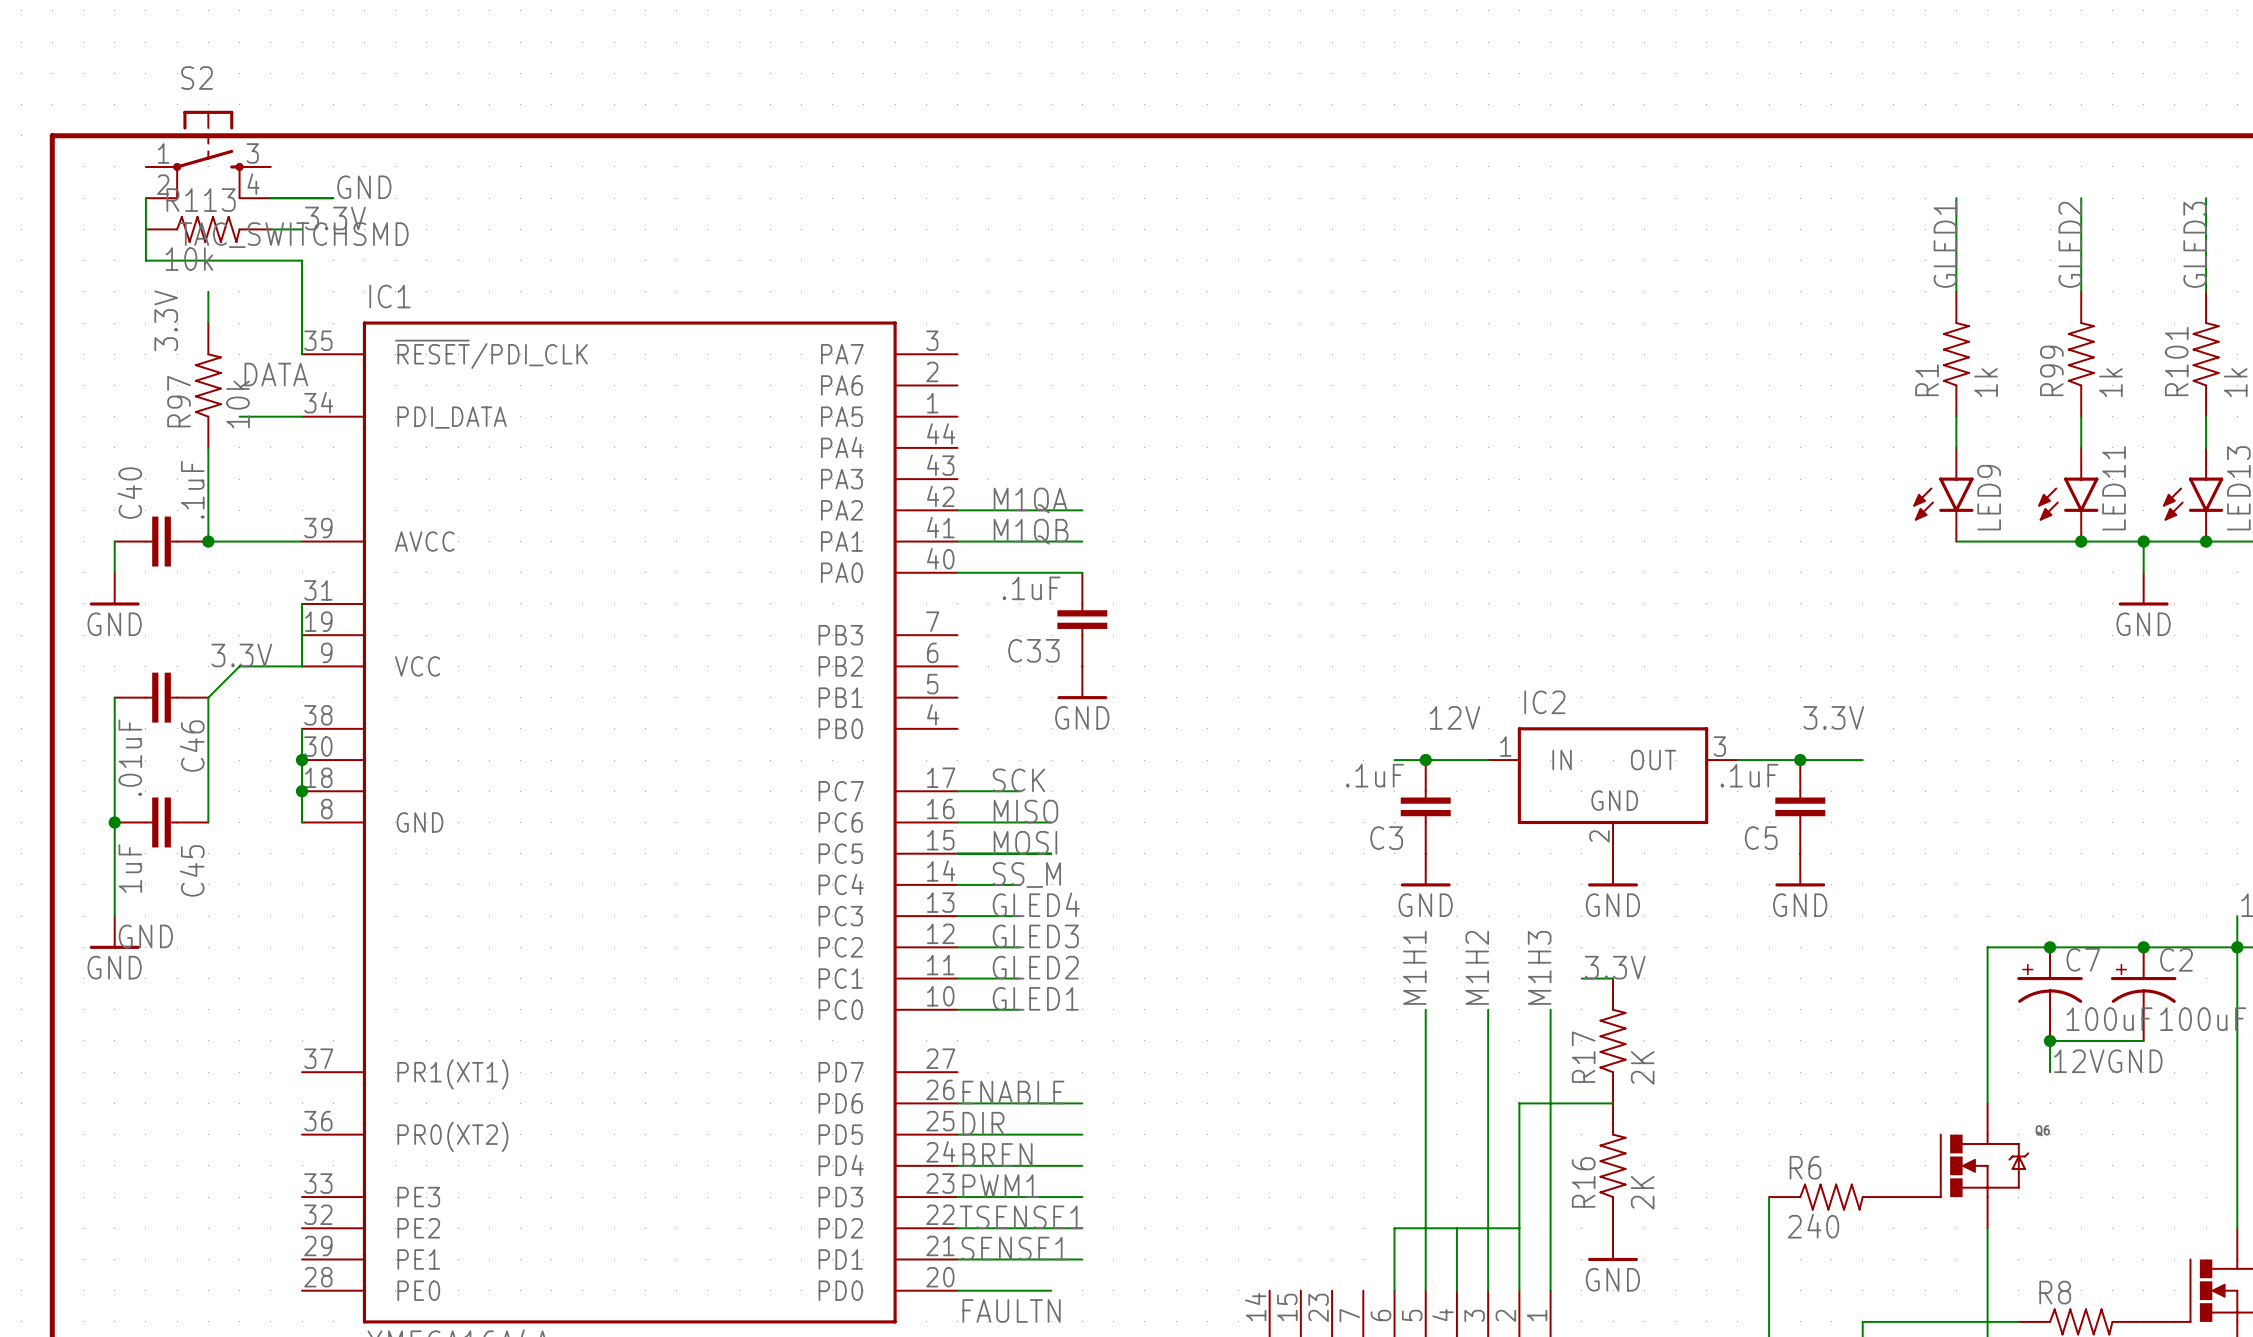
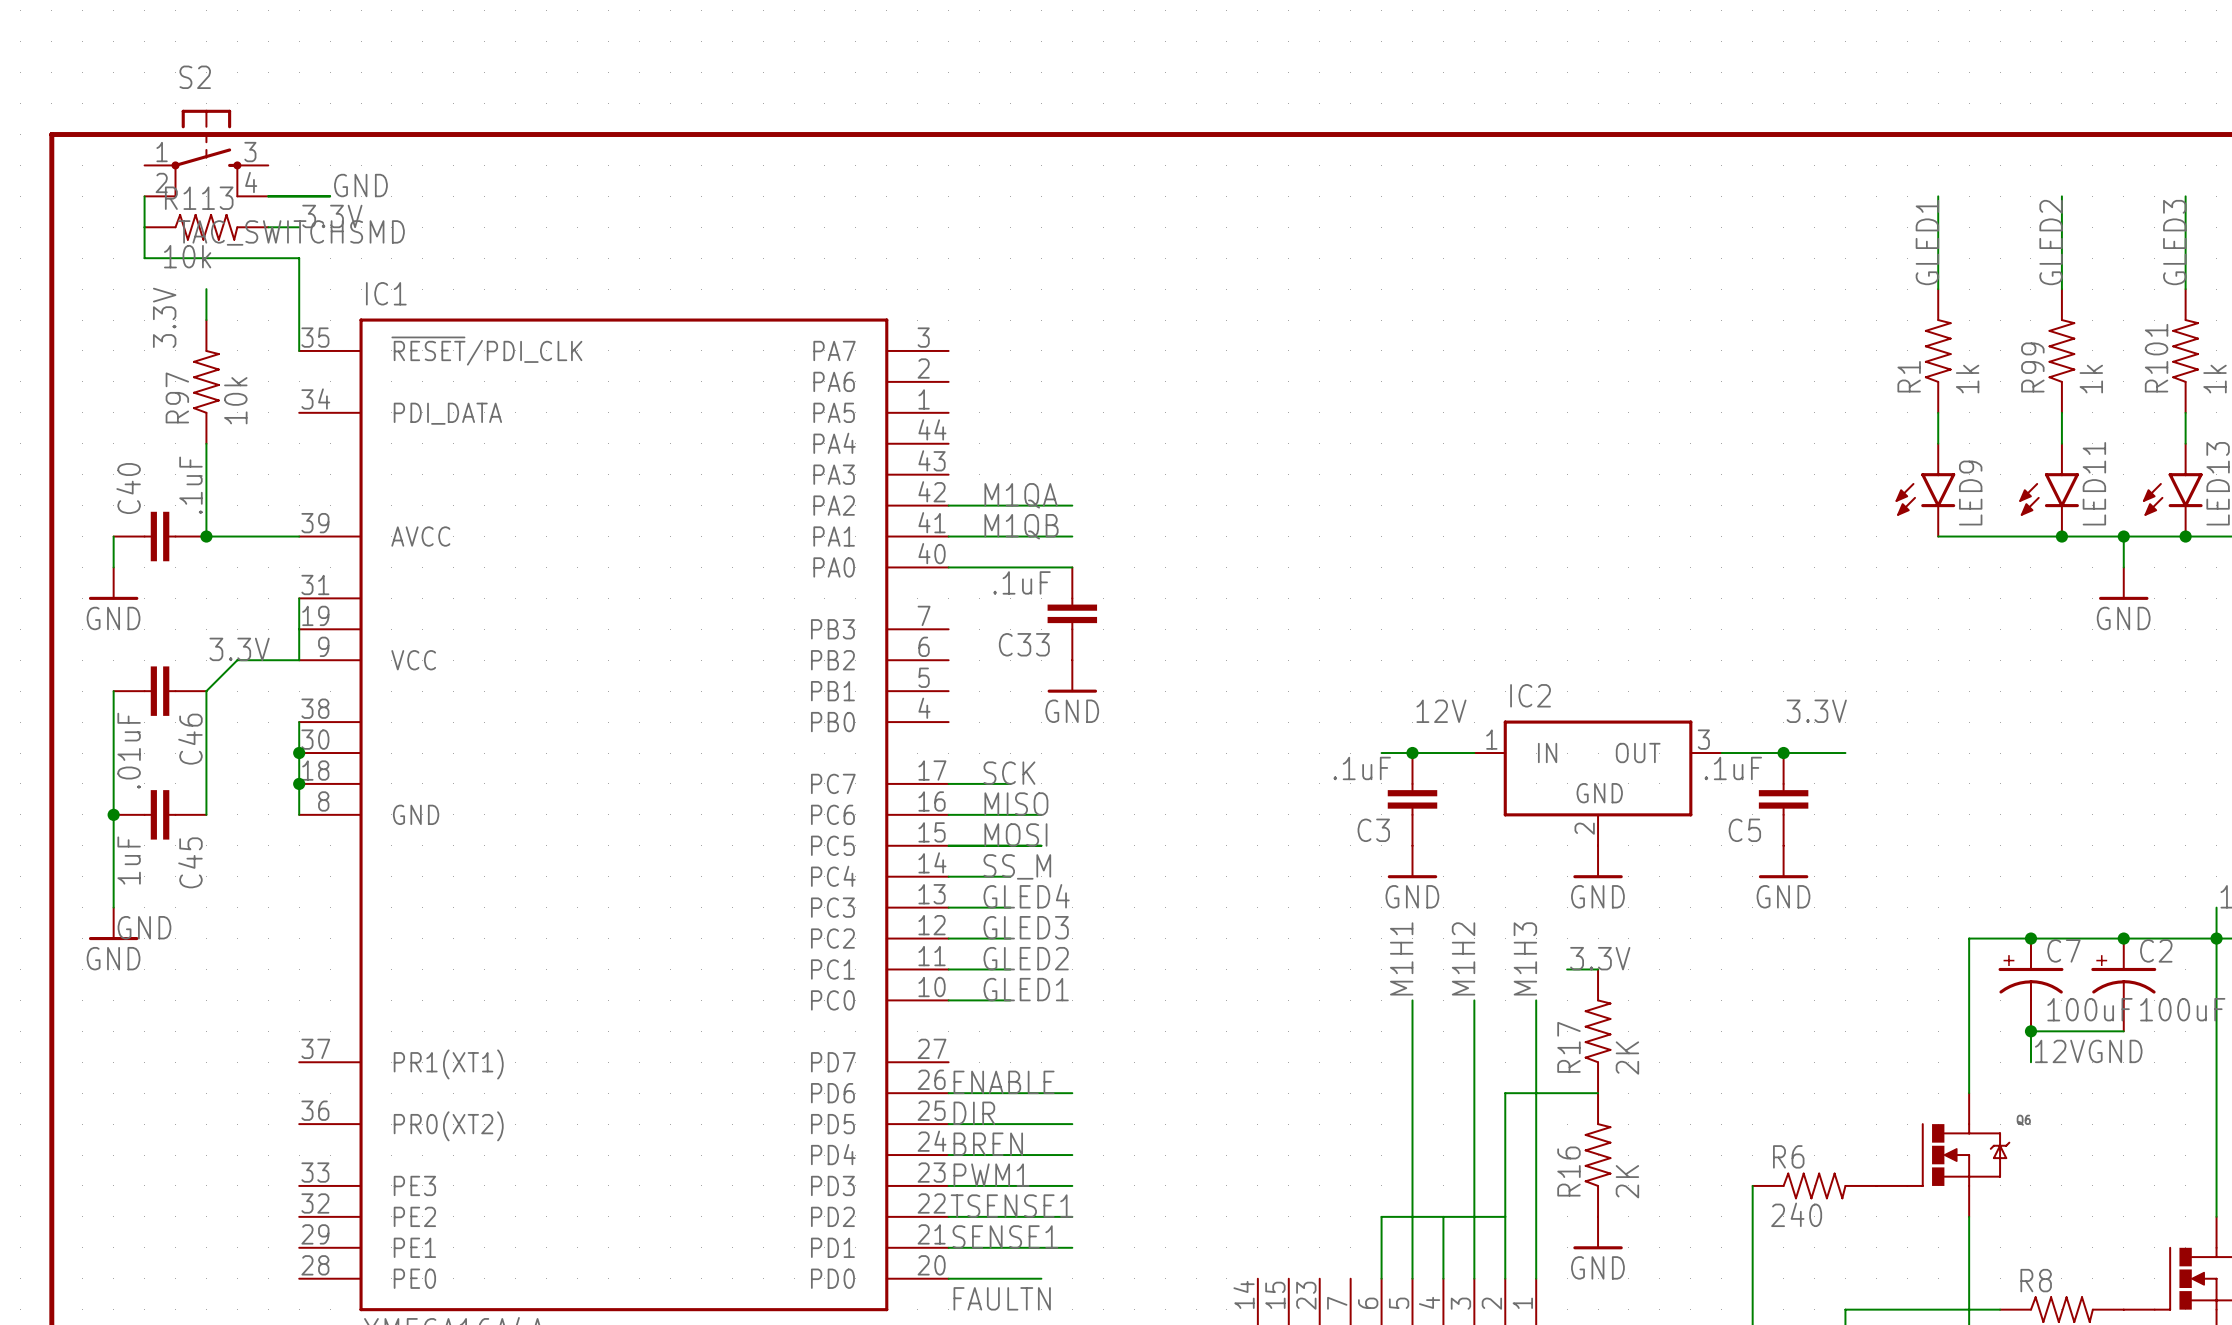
label: DATA (276, 374) -> none
wire: (239, 416) (302, 416) -> none

